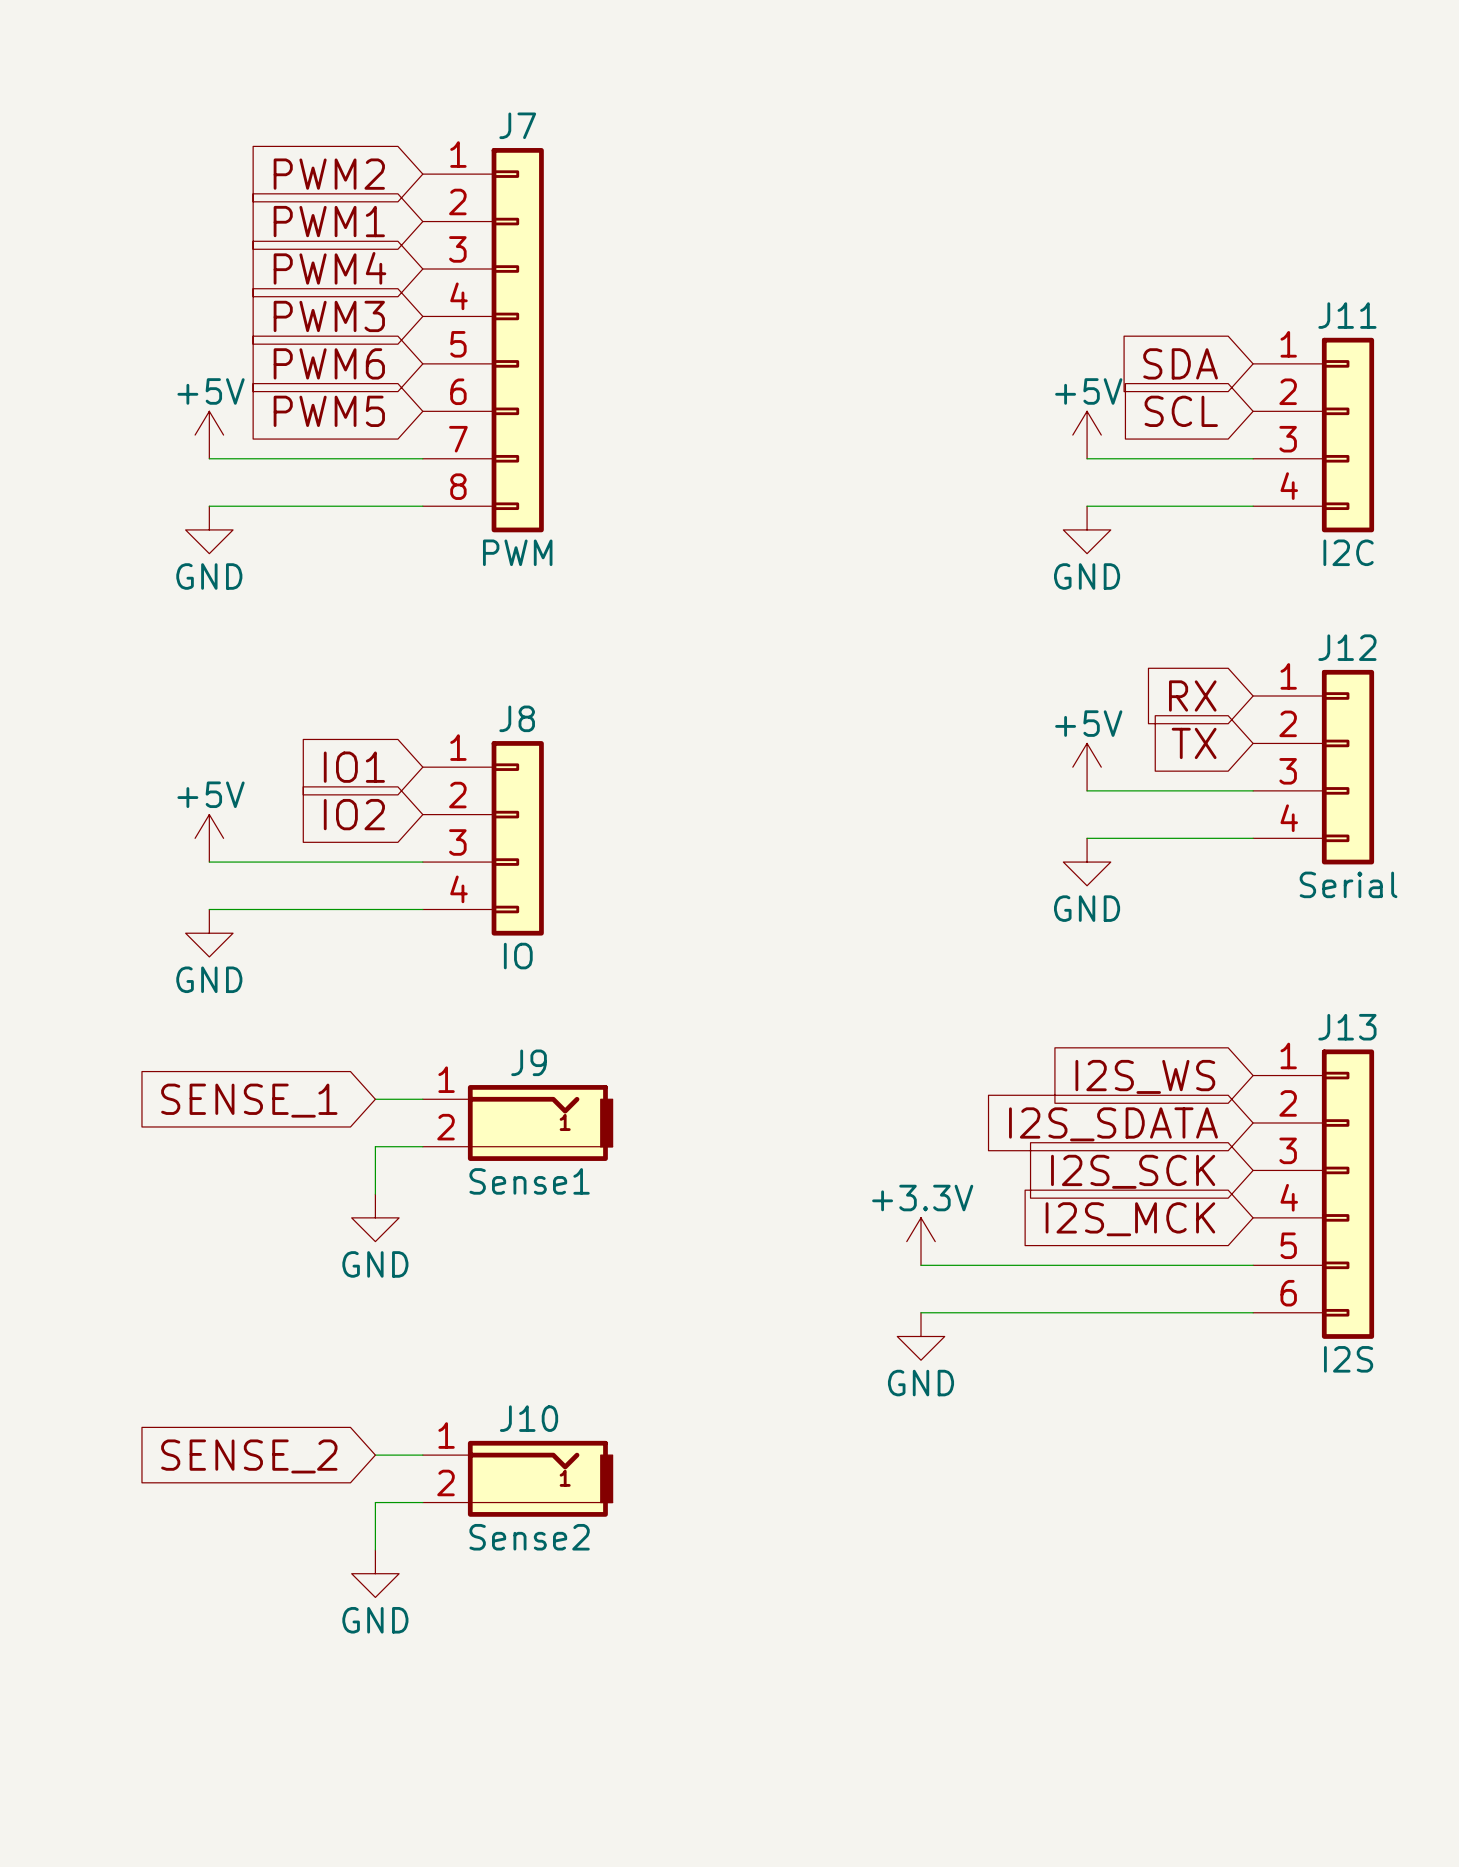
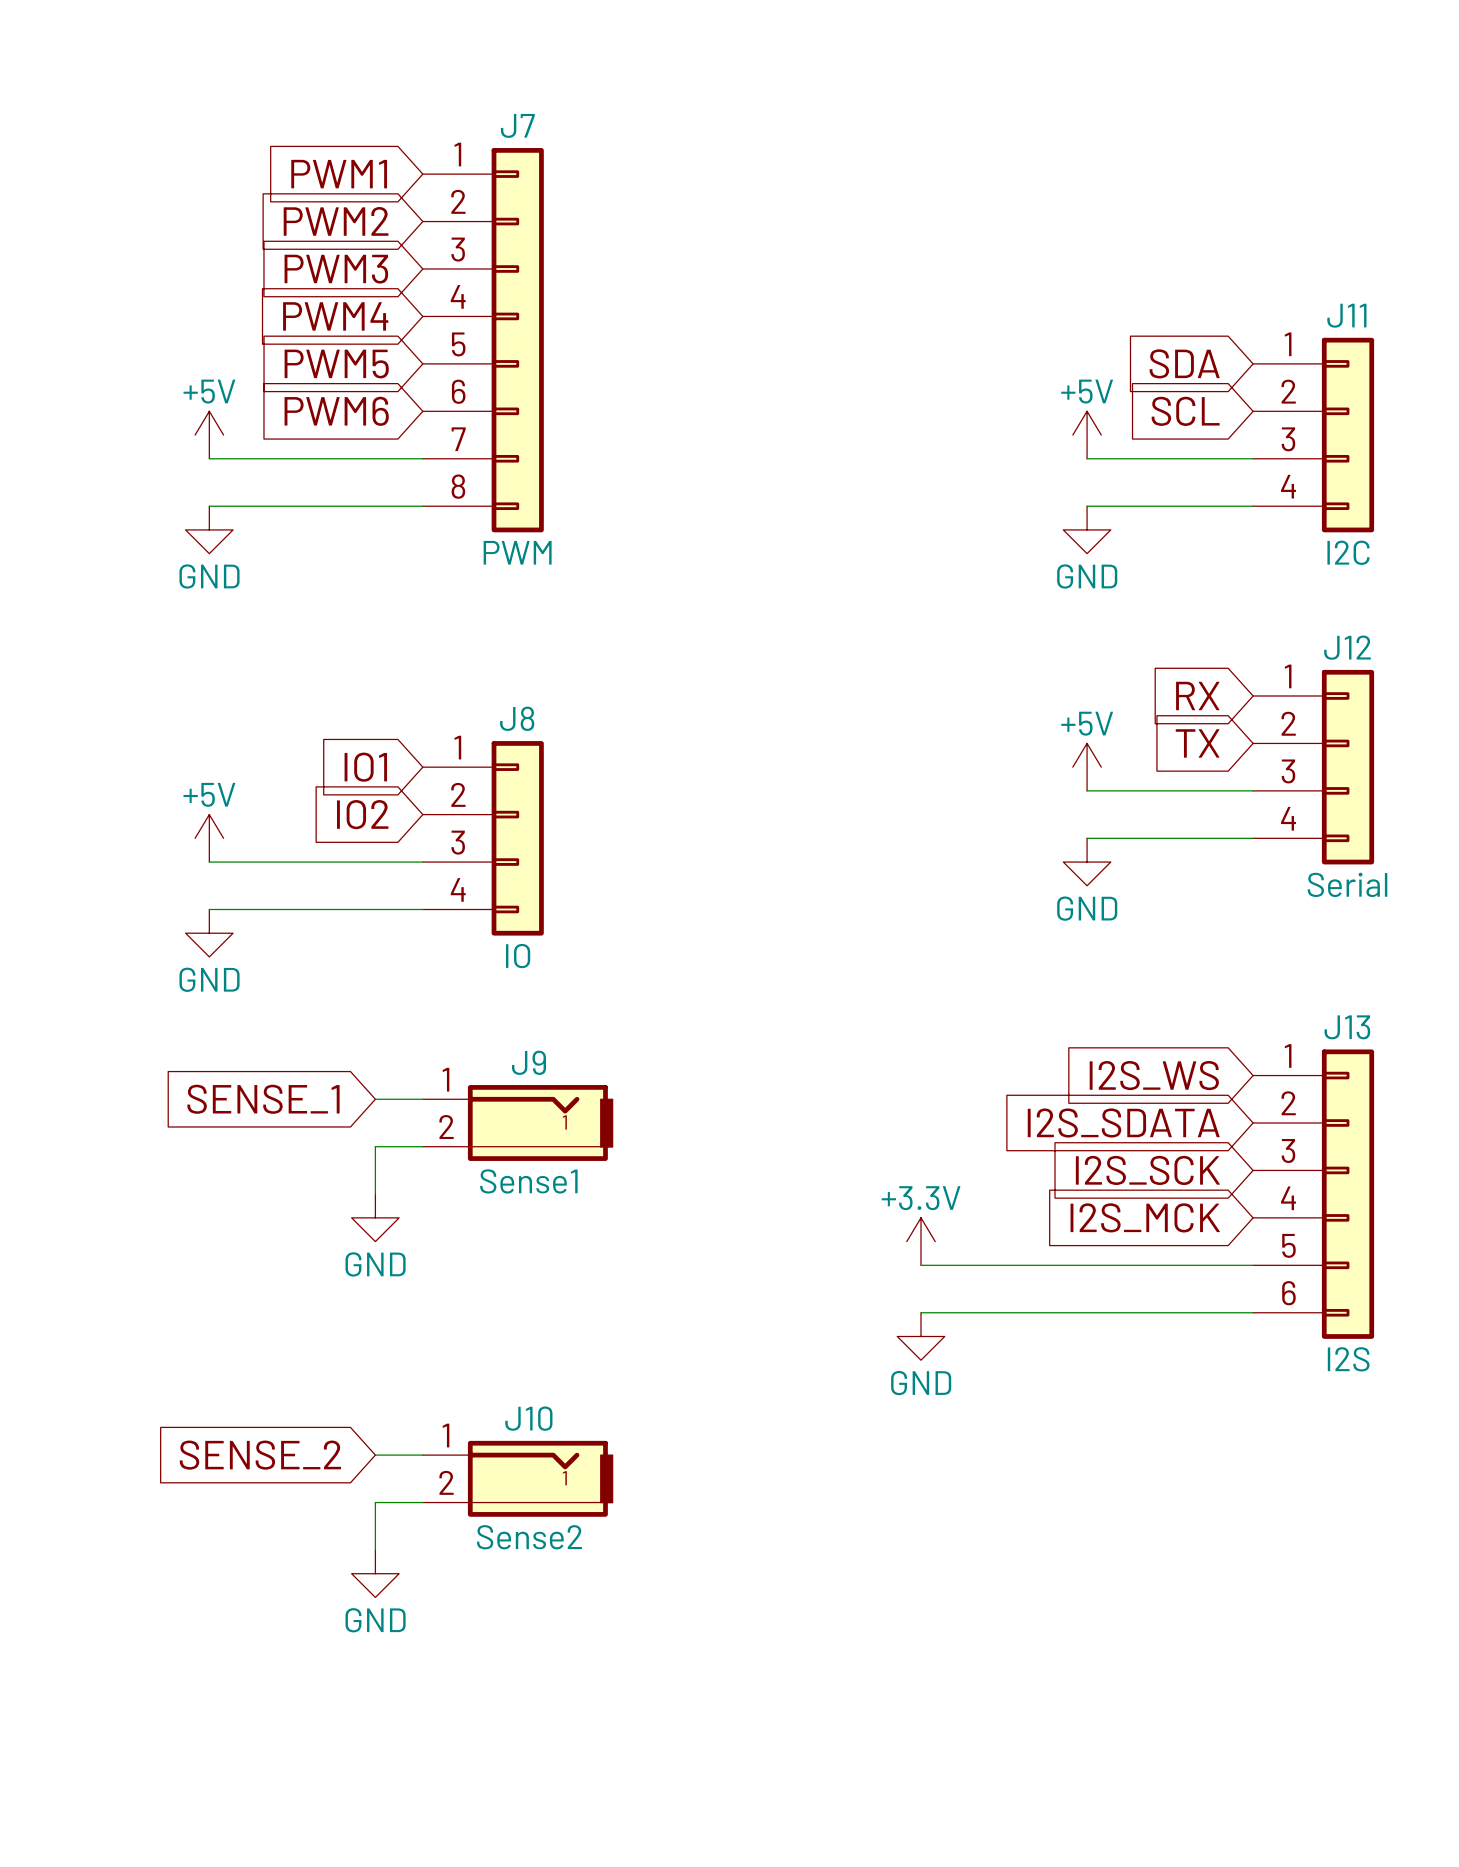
global label: PWM2 (329, 174) -> PWM1 (339, 174)
global label: PWM1 (329, 221) -> PWM2 (336, 221)
global label: PWM4 (329, 268) -> PWM3 (336, 269)
global label: PWM3 (329, 316) -> PWM4 (335, 316)
global label: PWM6 (329, 363) -> PWM5 (336, 364)
global label: PWM5 (329, 411) -> PWM6 (336, 411)

